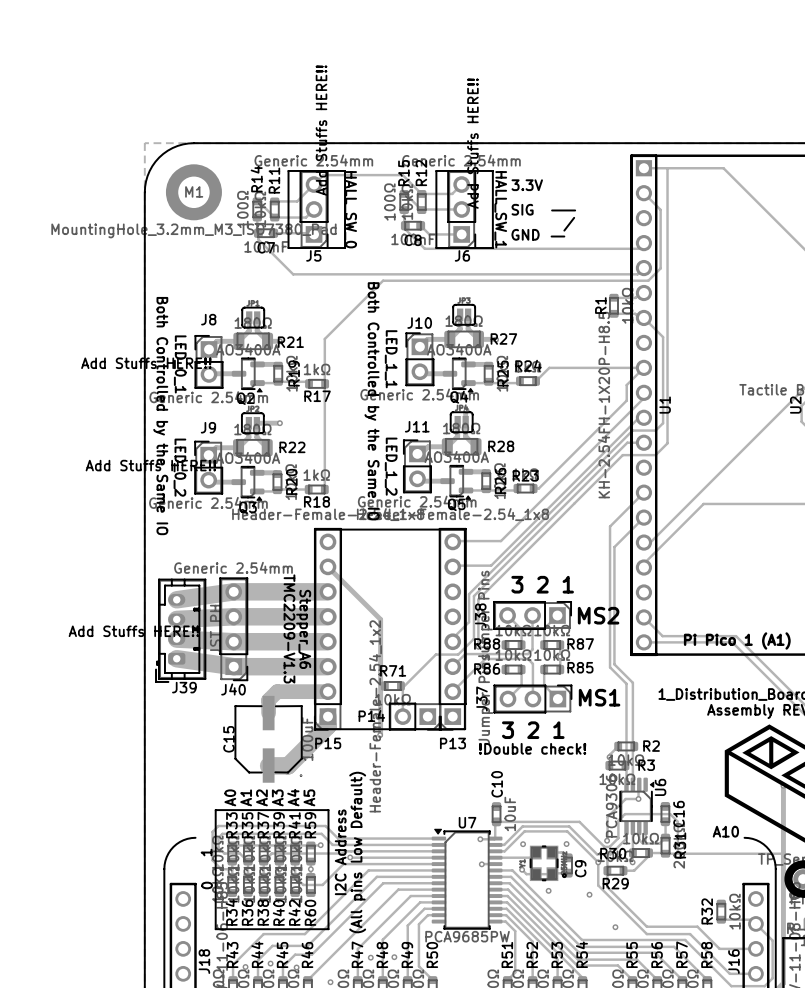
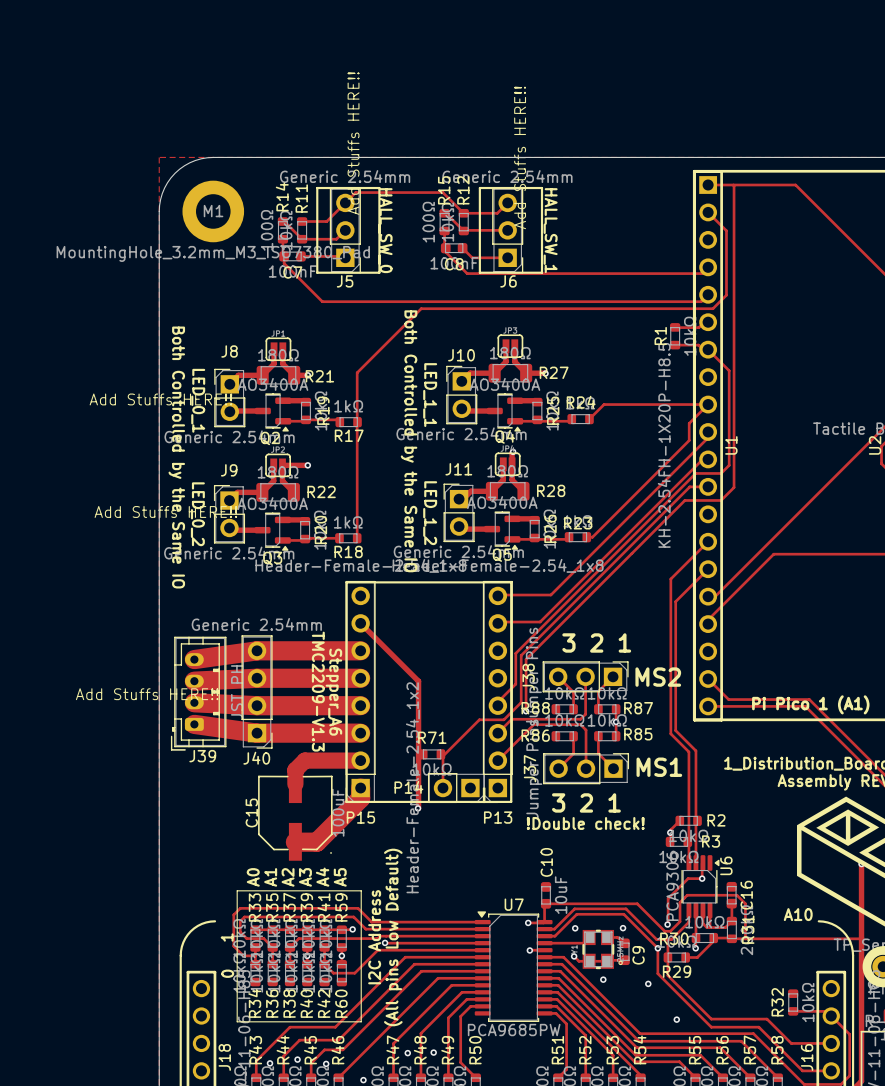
text: 3.3V (527, 185) -> none
text: SIG (522, 209) -> none
line: (552, 210) (575, 210) -> none
line: (574, 217) (564, 230) -> none
text: GND (525, 234) -> none
line: (551, 236) (564, 236) -> none

